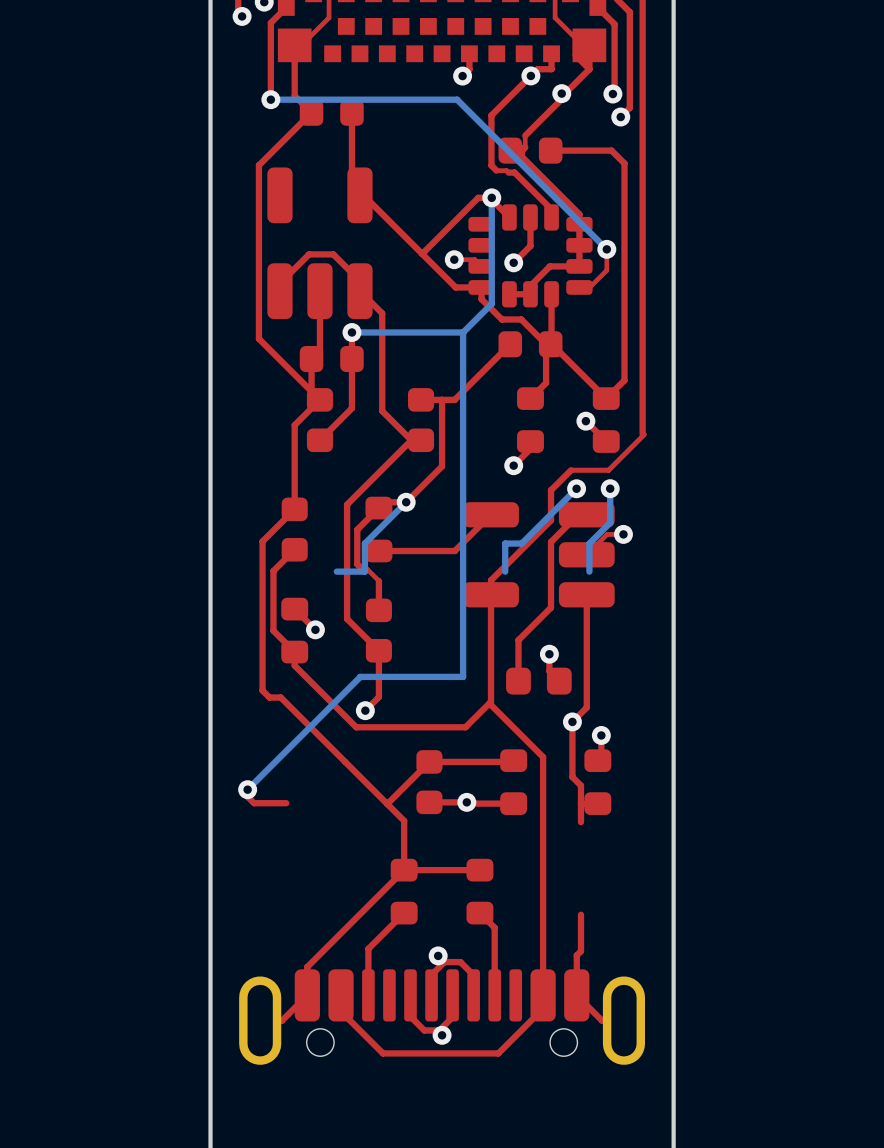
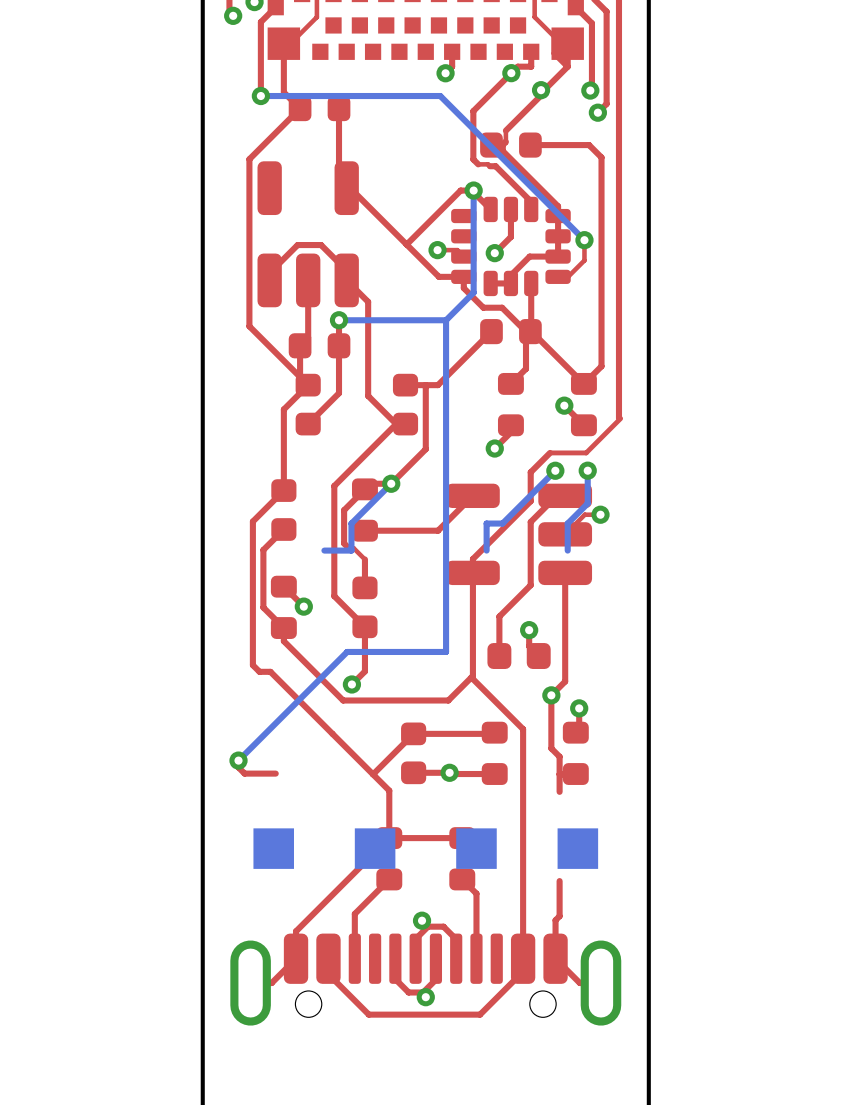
part: none -> (273, 848)
part: none -> (375, 848)
part: none -> (476, 848)
part: none -> (577, 848)

